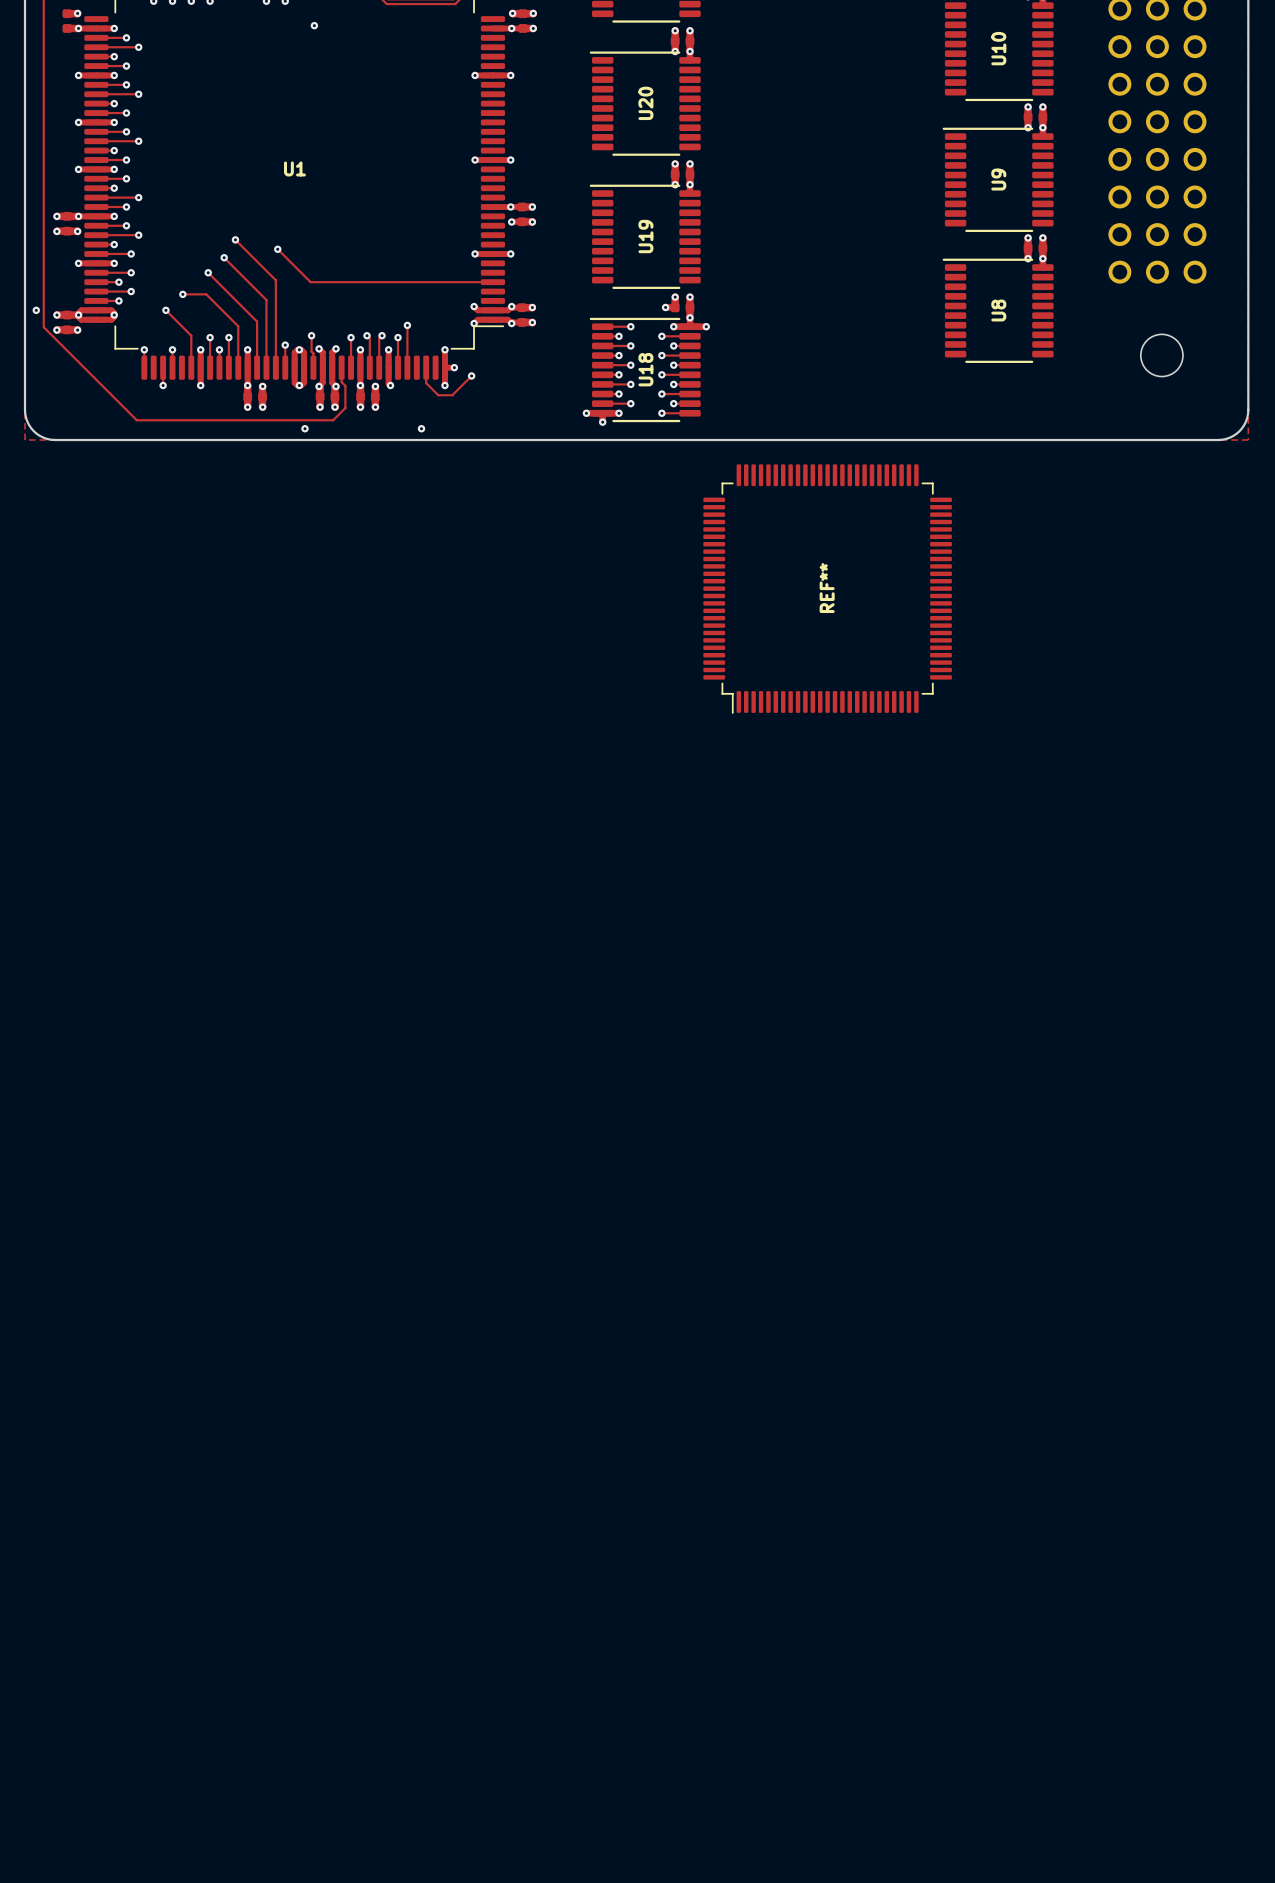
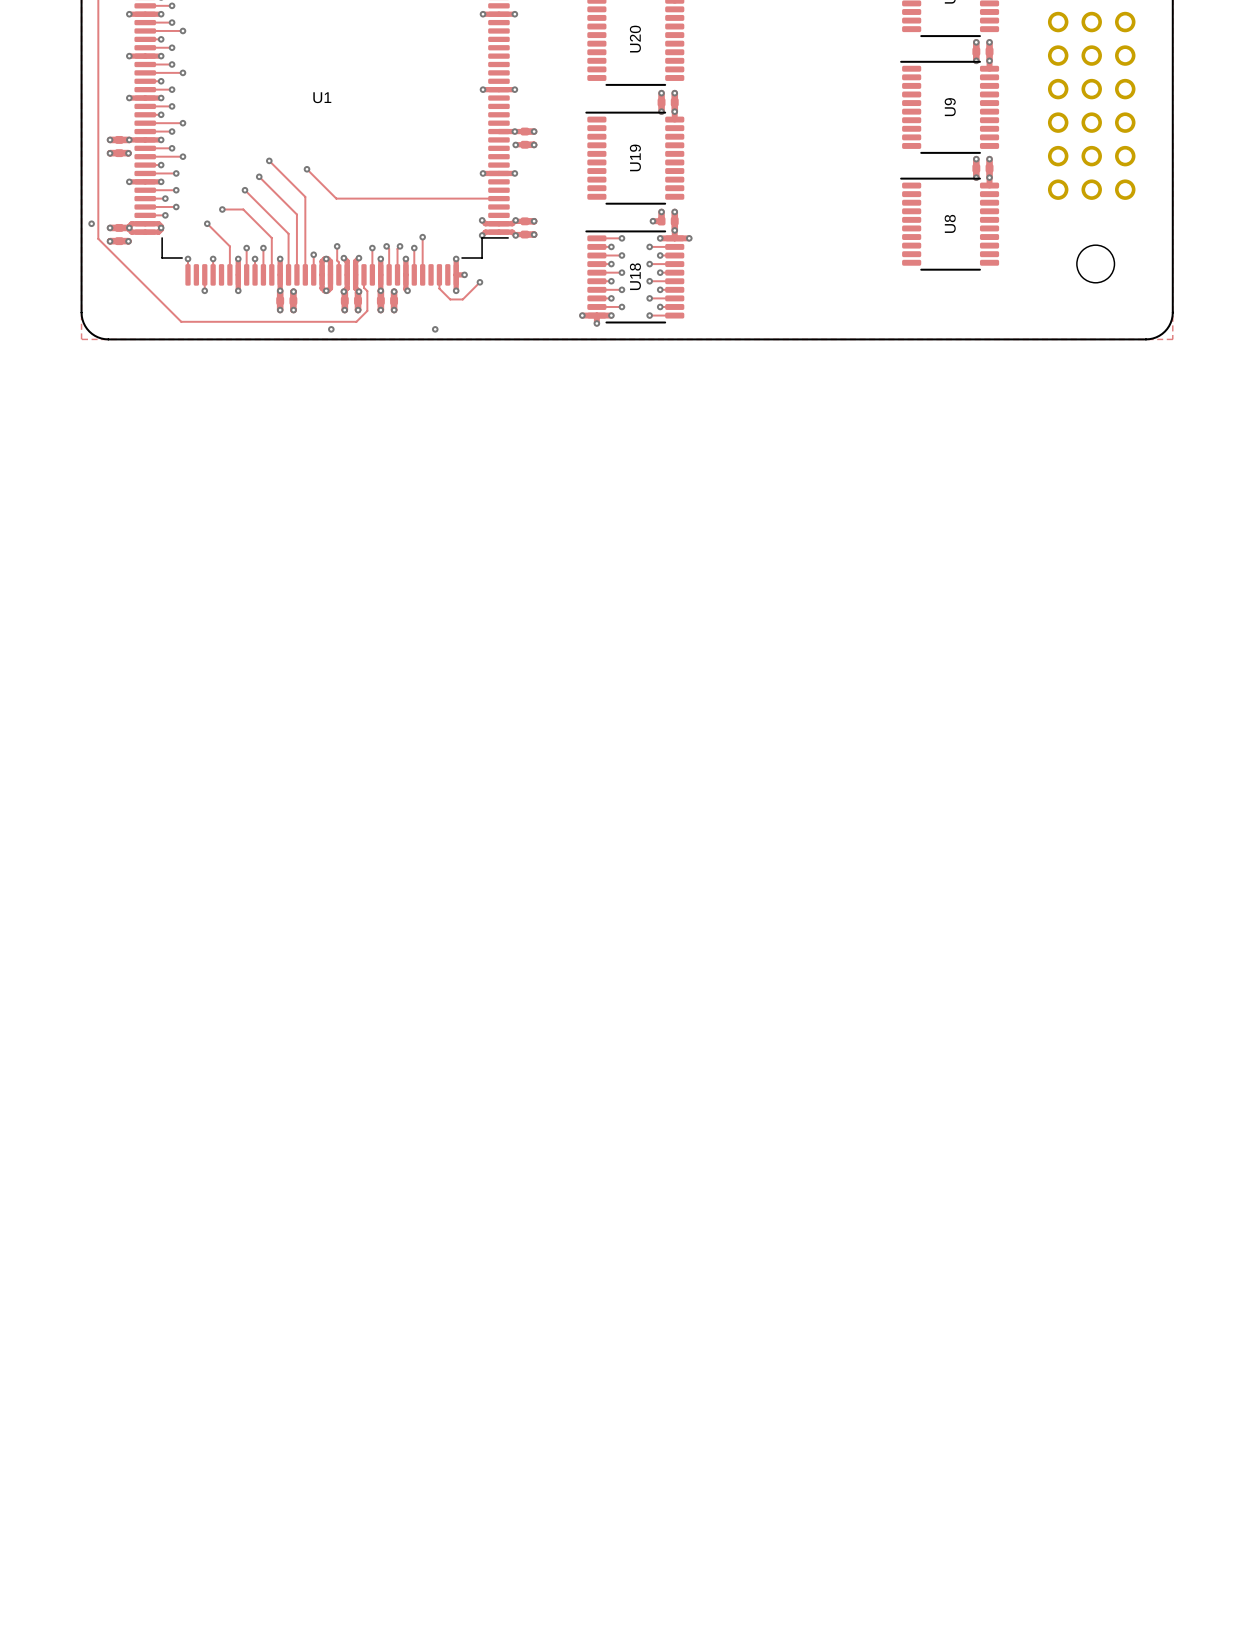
REF**: (827, 589) -> none

